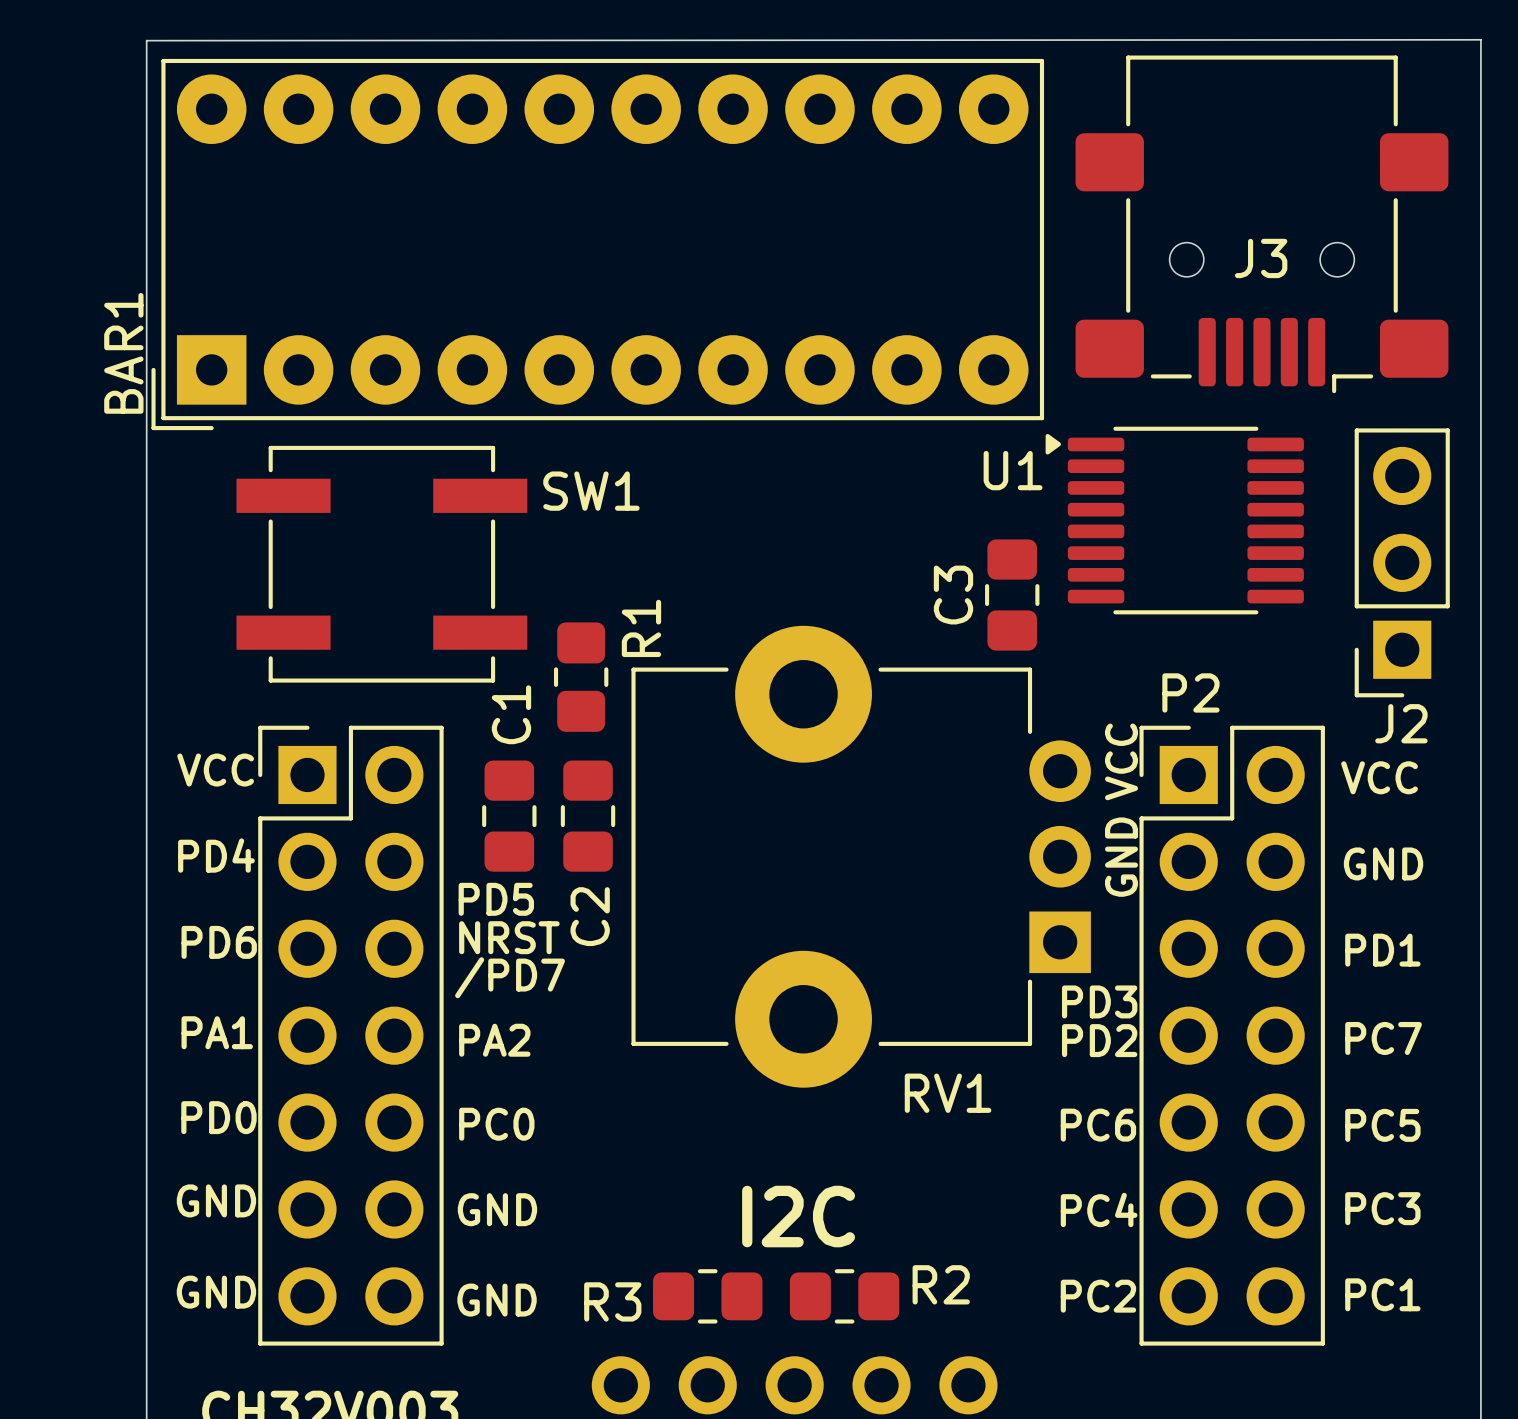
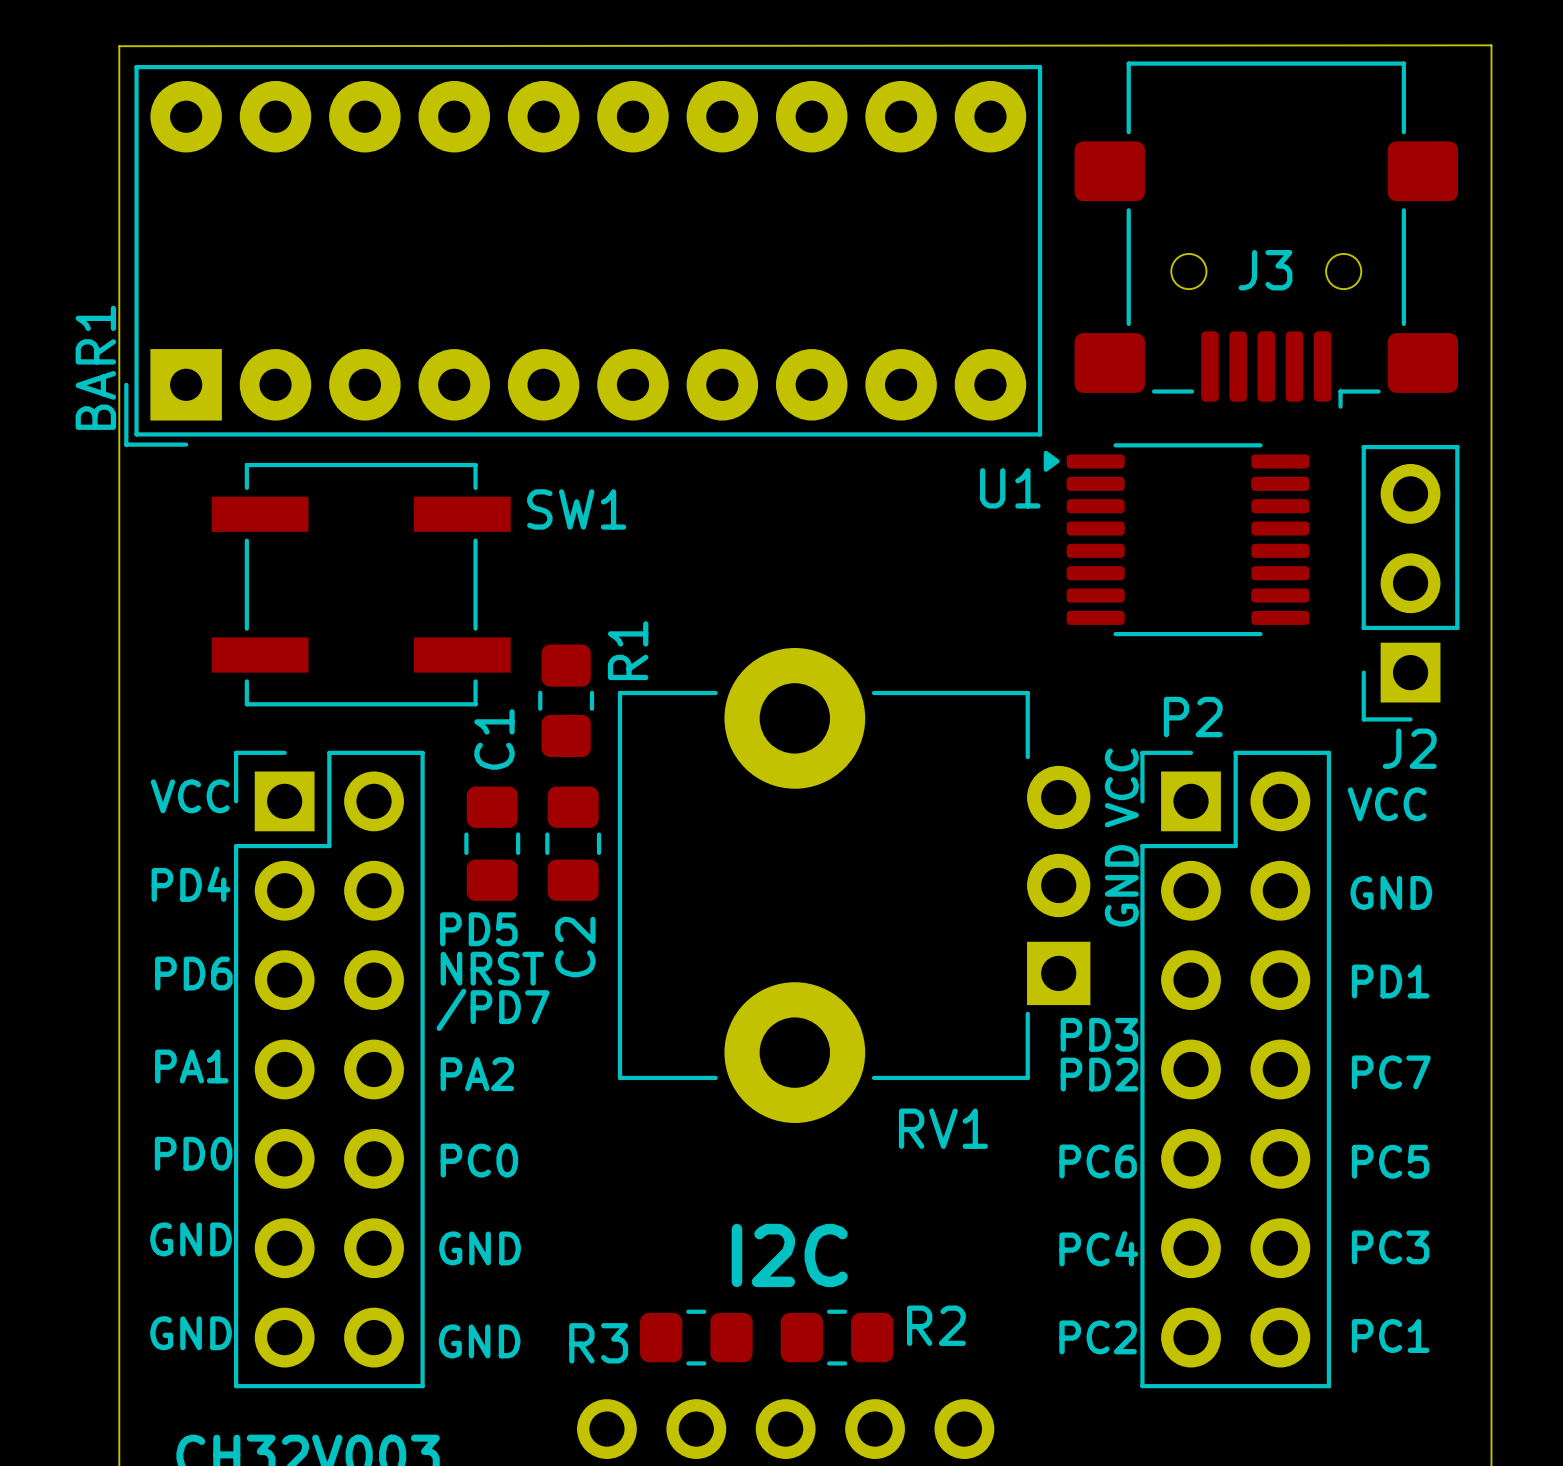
C3: (1012, 595) -> none

